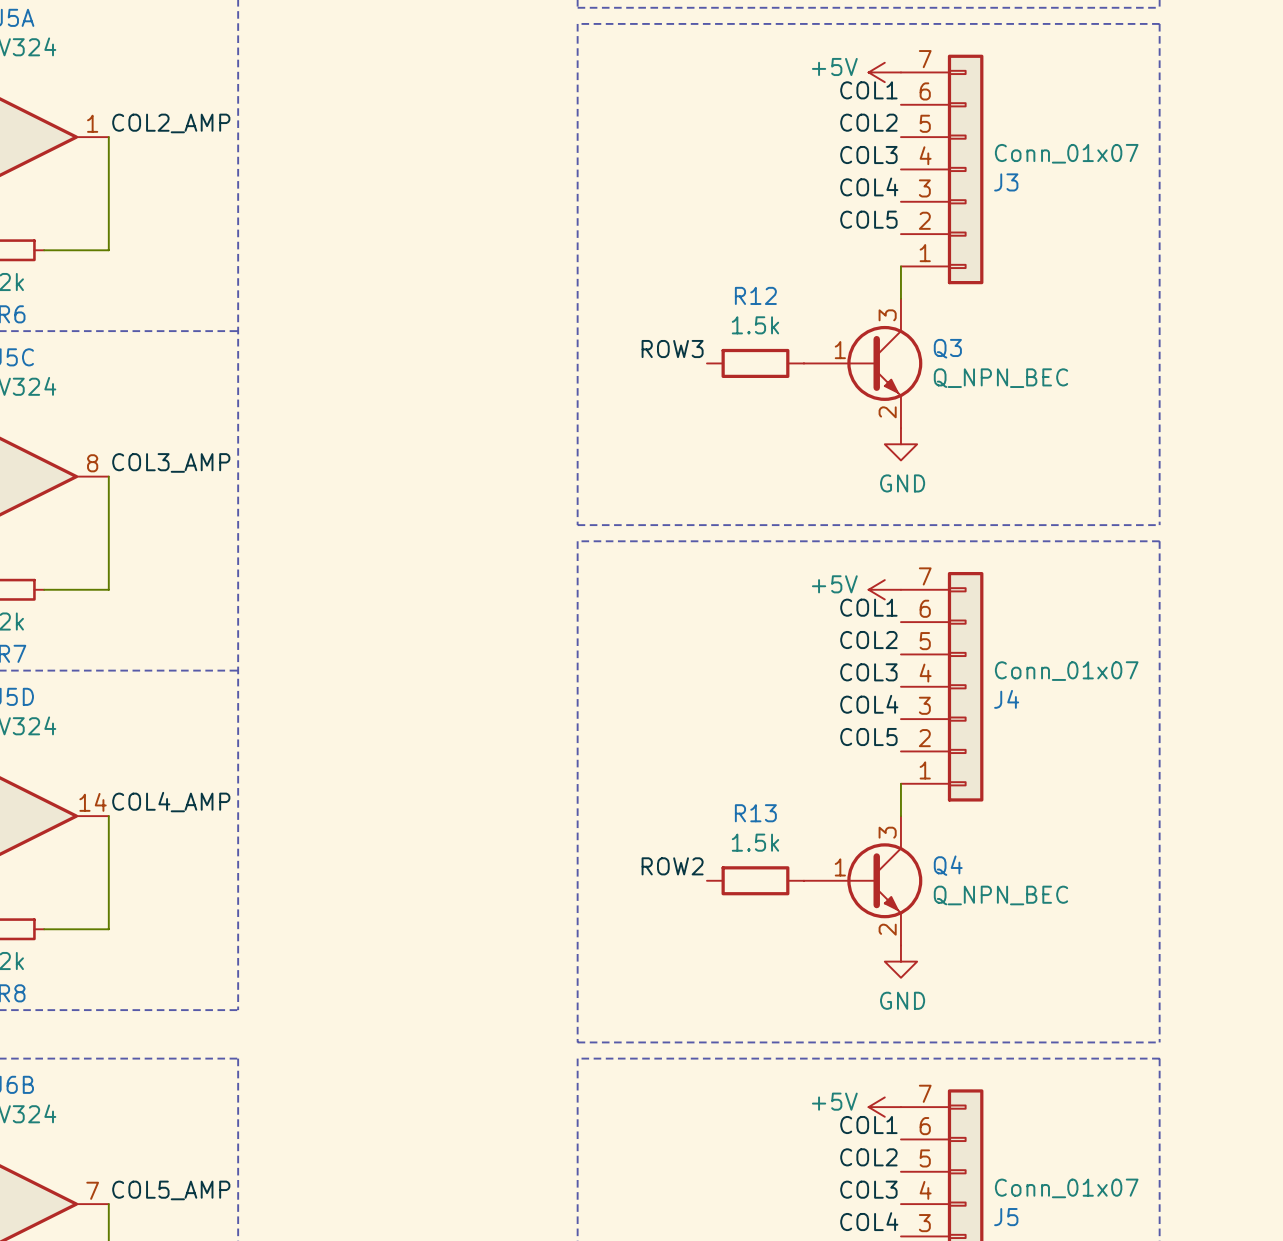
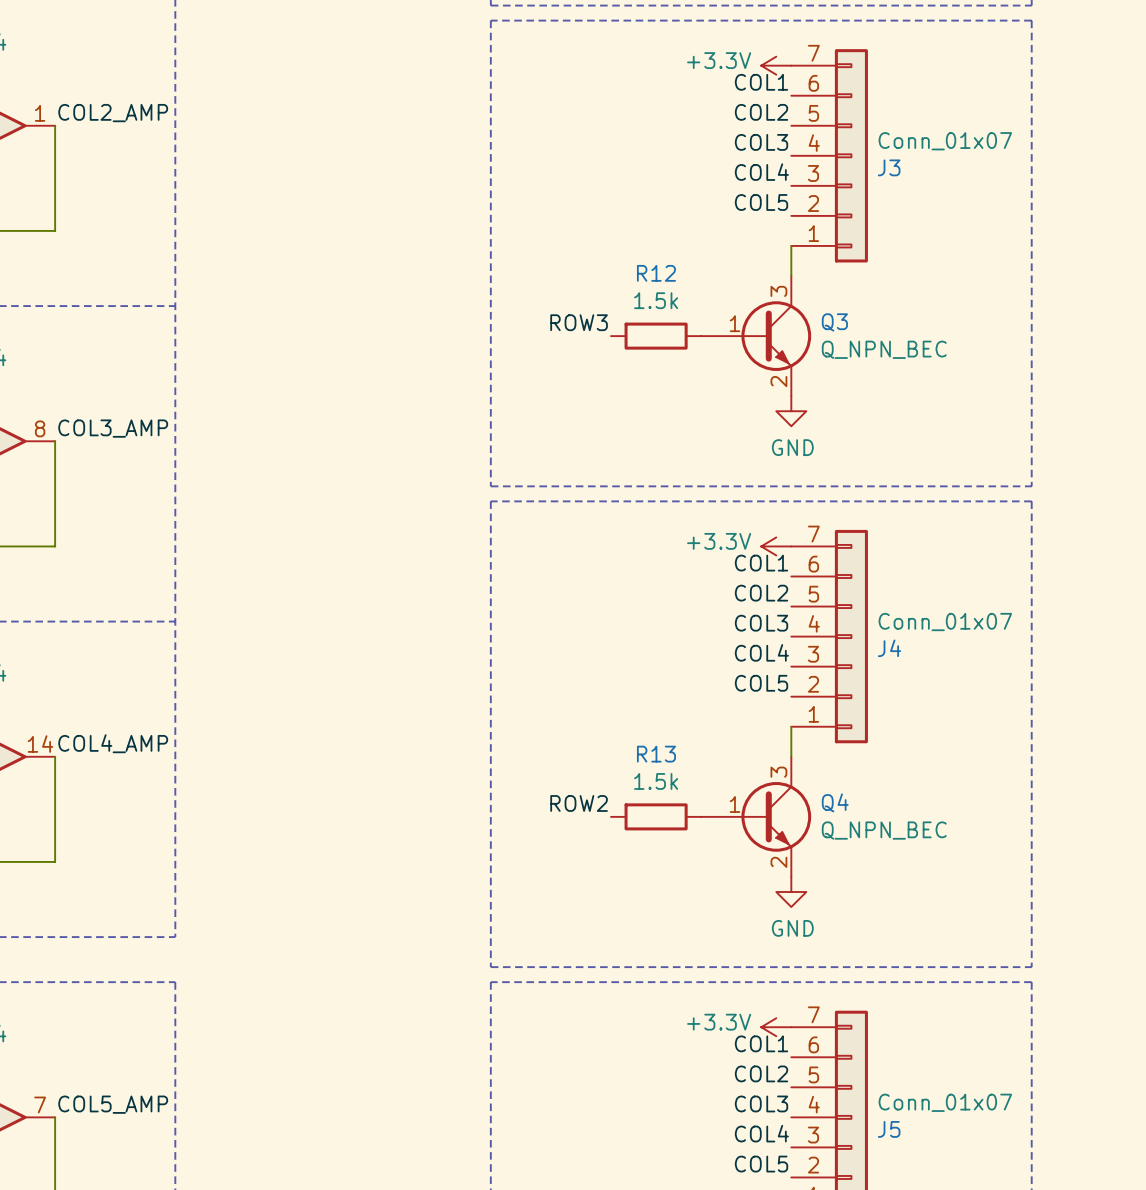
power symbol: +5V (884, 72) -> +3.3V (776, 65)
power symbol: +5V (884, 589) -> +3.3V (776, 546)
power symbol: +5V (884, 1107) -> +3.3V (776, 1027)

